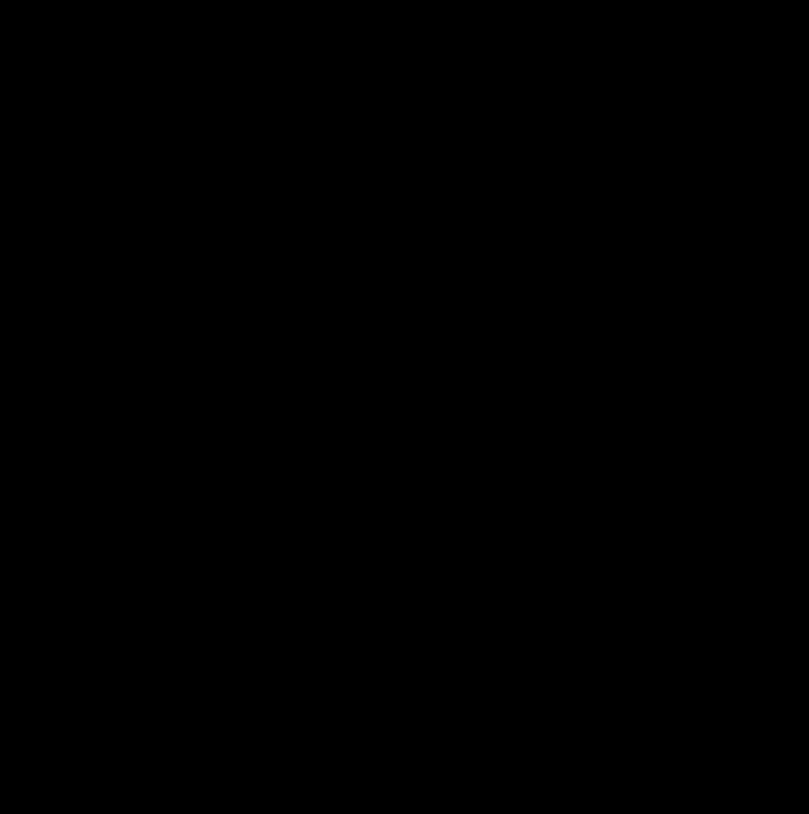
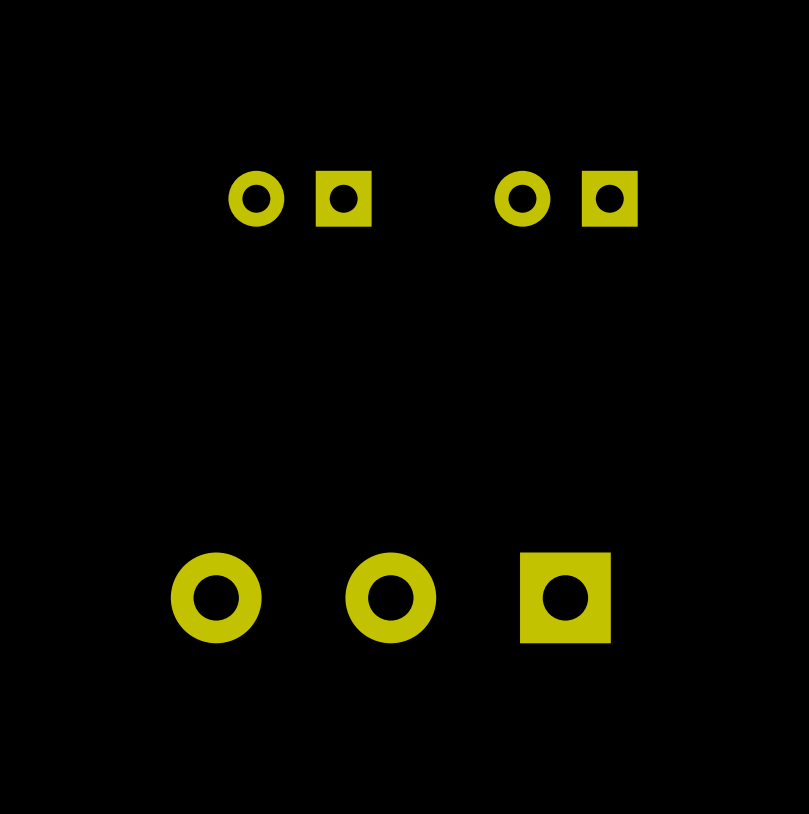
part: none -> (300, 198)
part: none -> (566, 198)
part: none -> (390, 597)

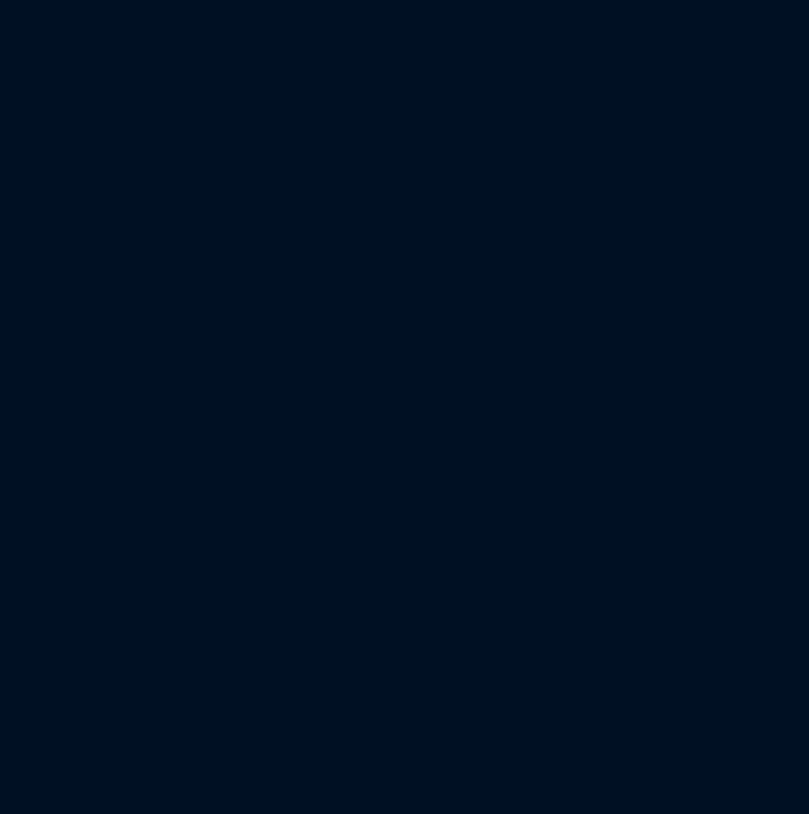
part: (300, 198) -> none
part: (566, 198) -> none
part: (390, 597) -> none

